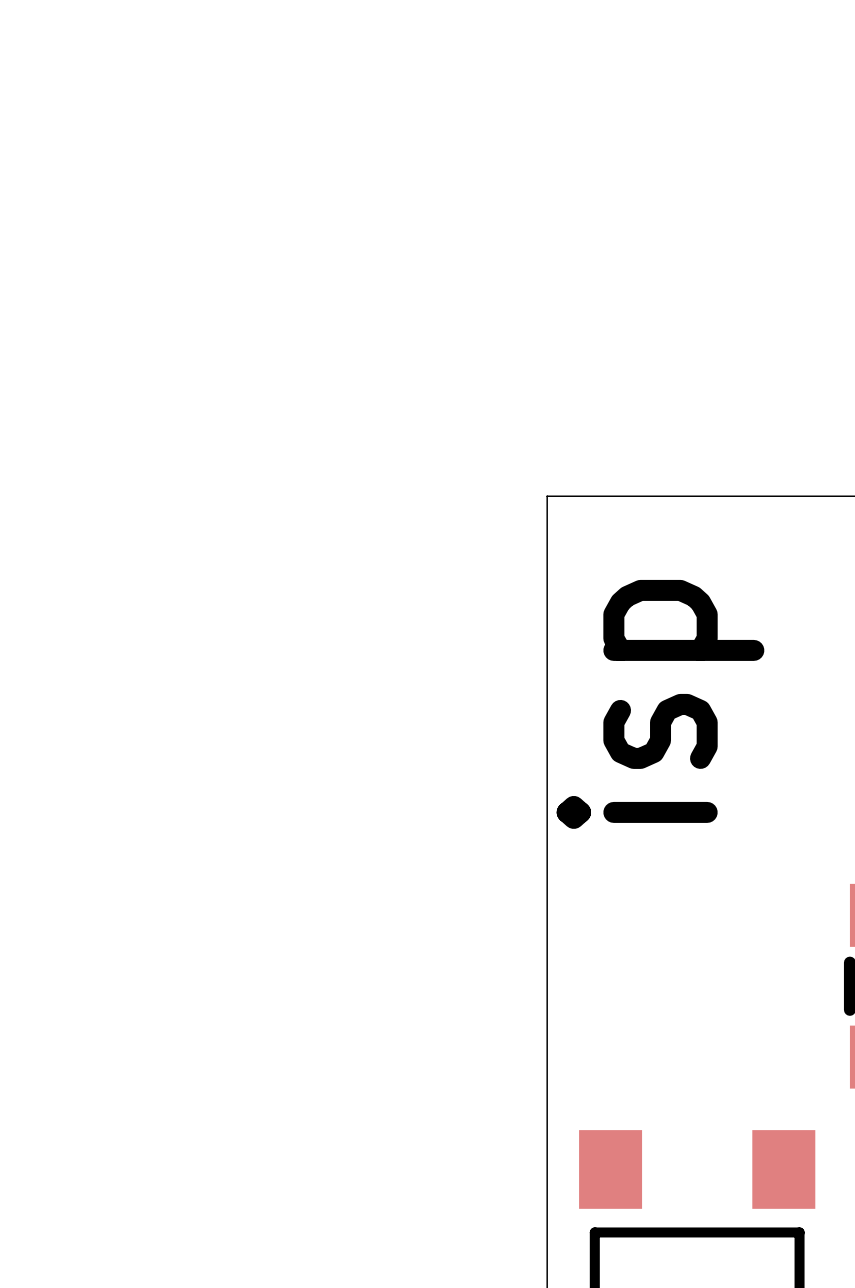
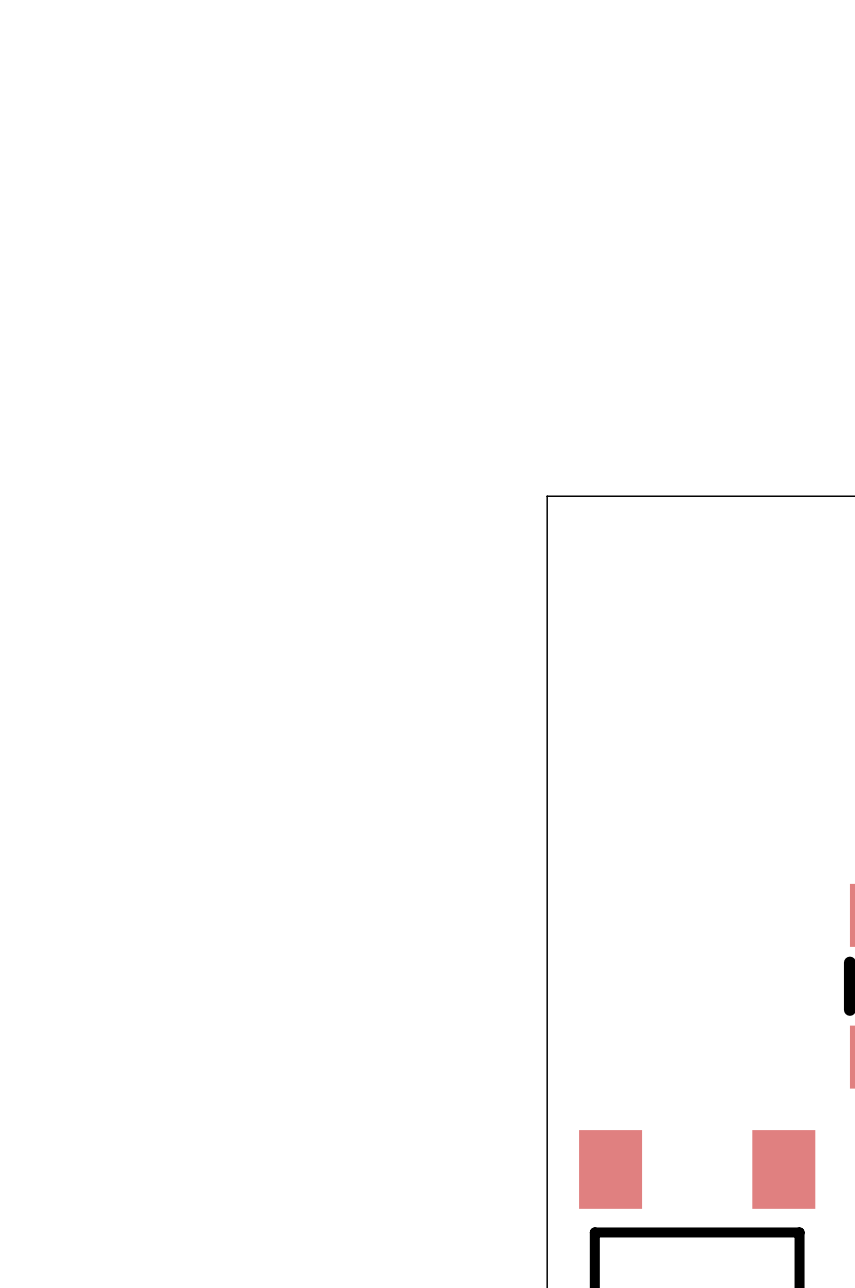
text: isp (660, 704) -> none

